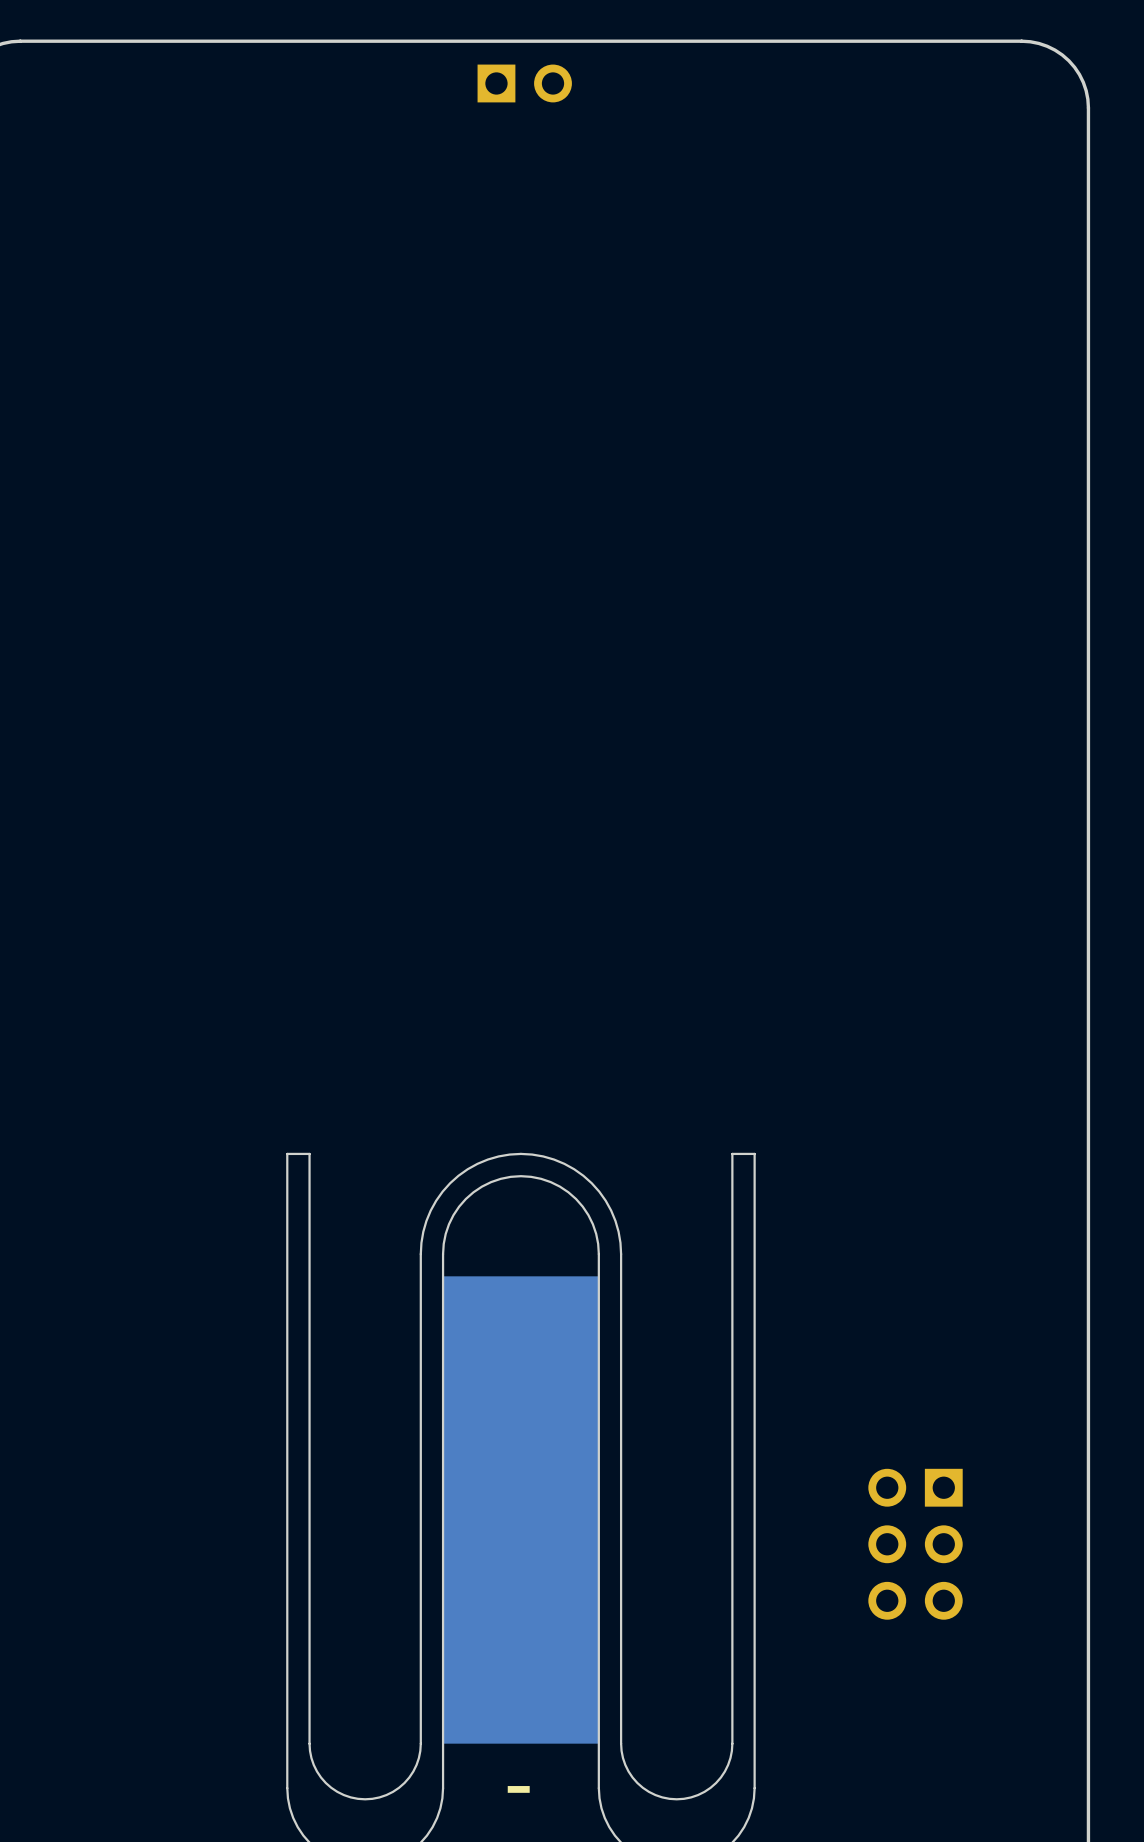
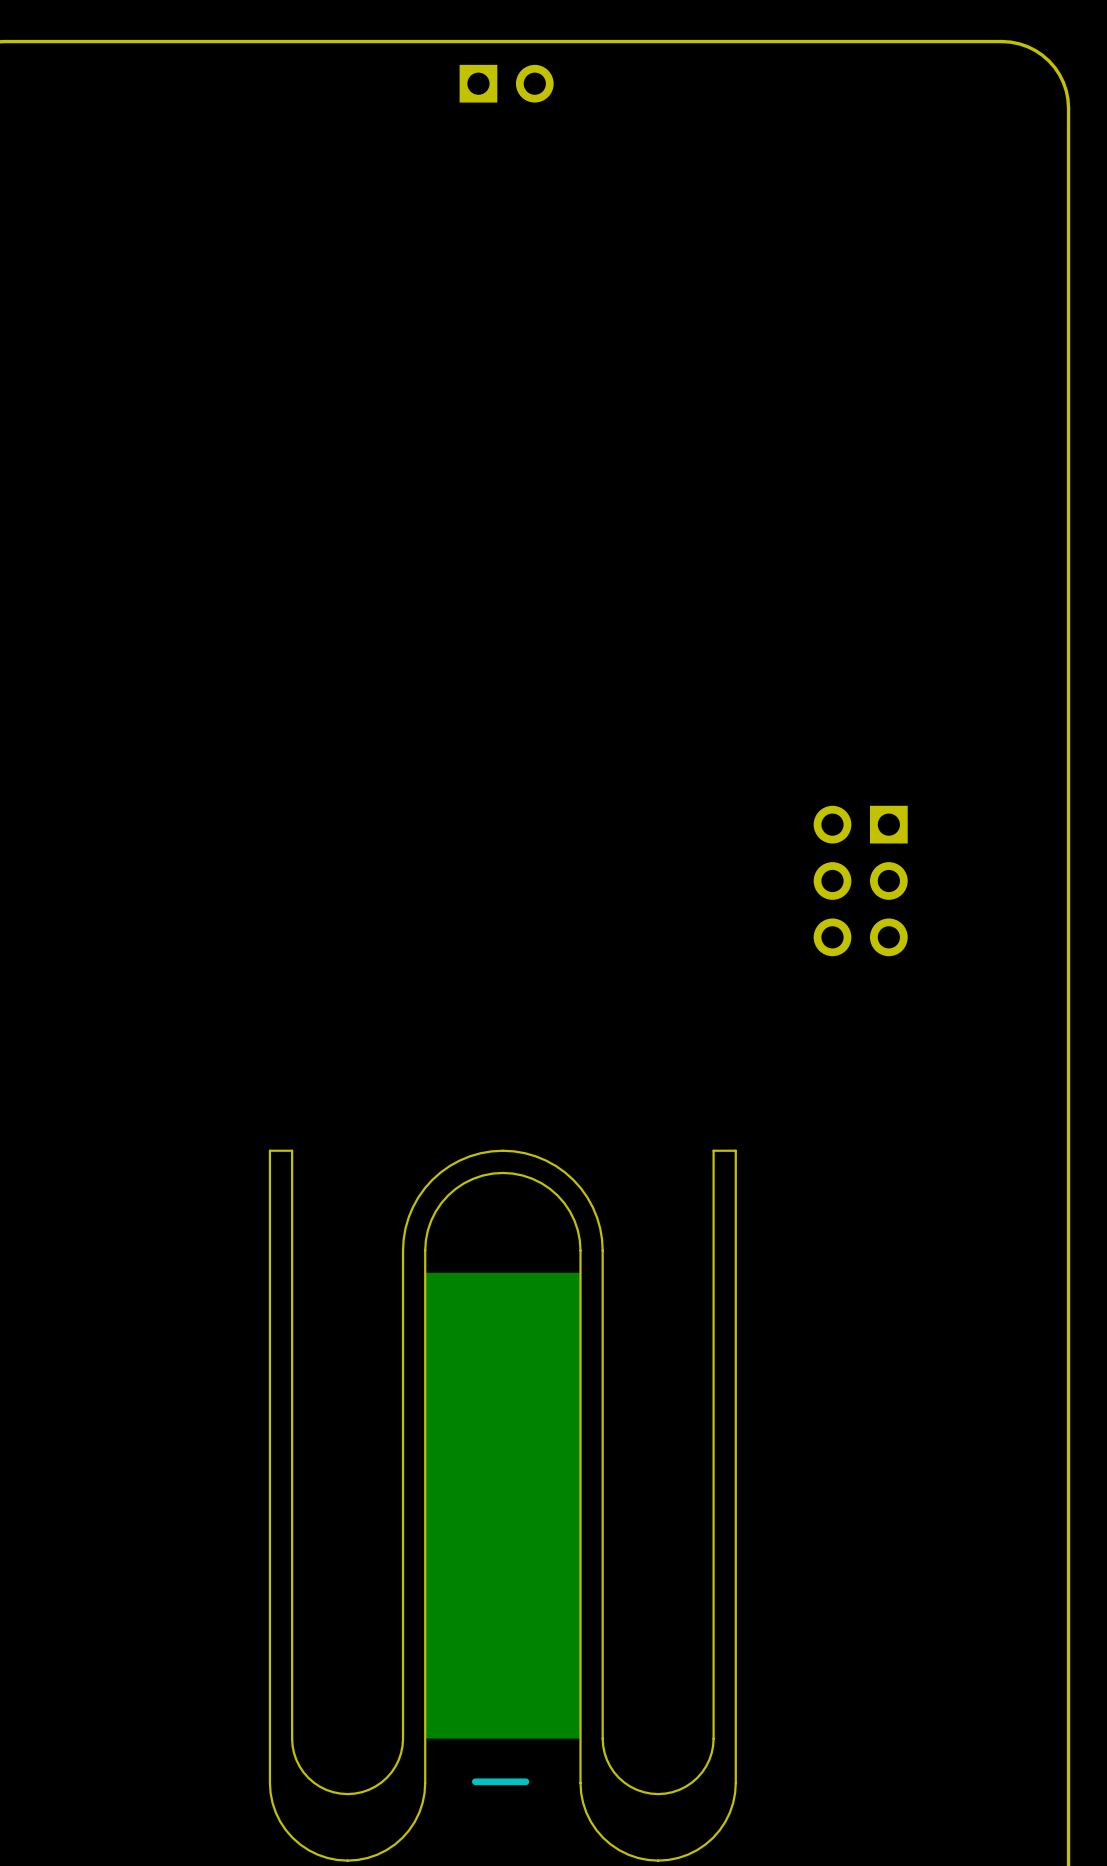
part: none -> (860, 880)
part: (915, 1544) -> none

